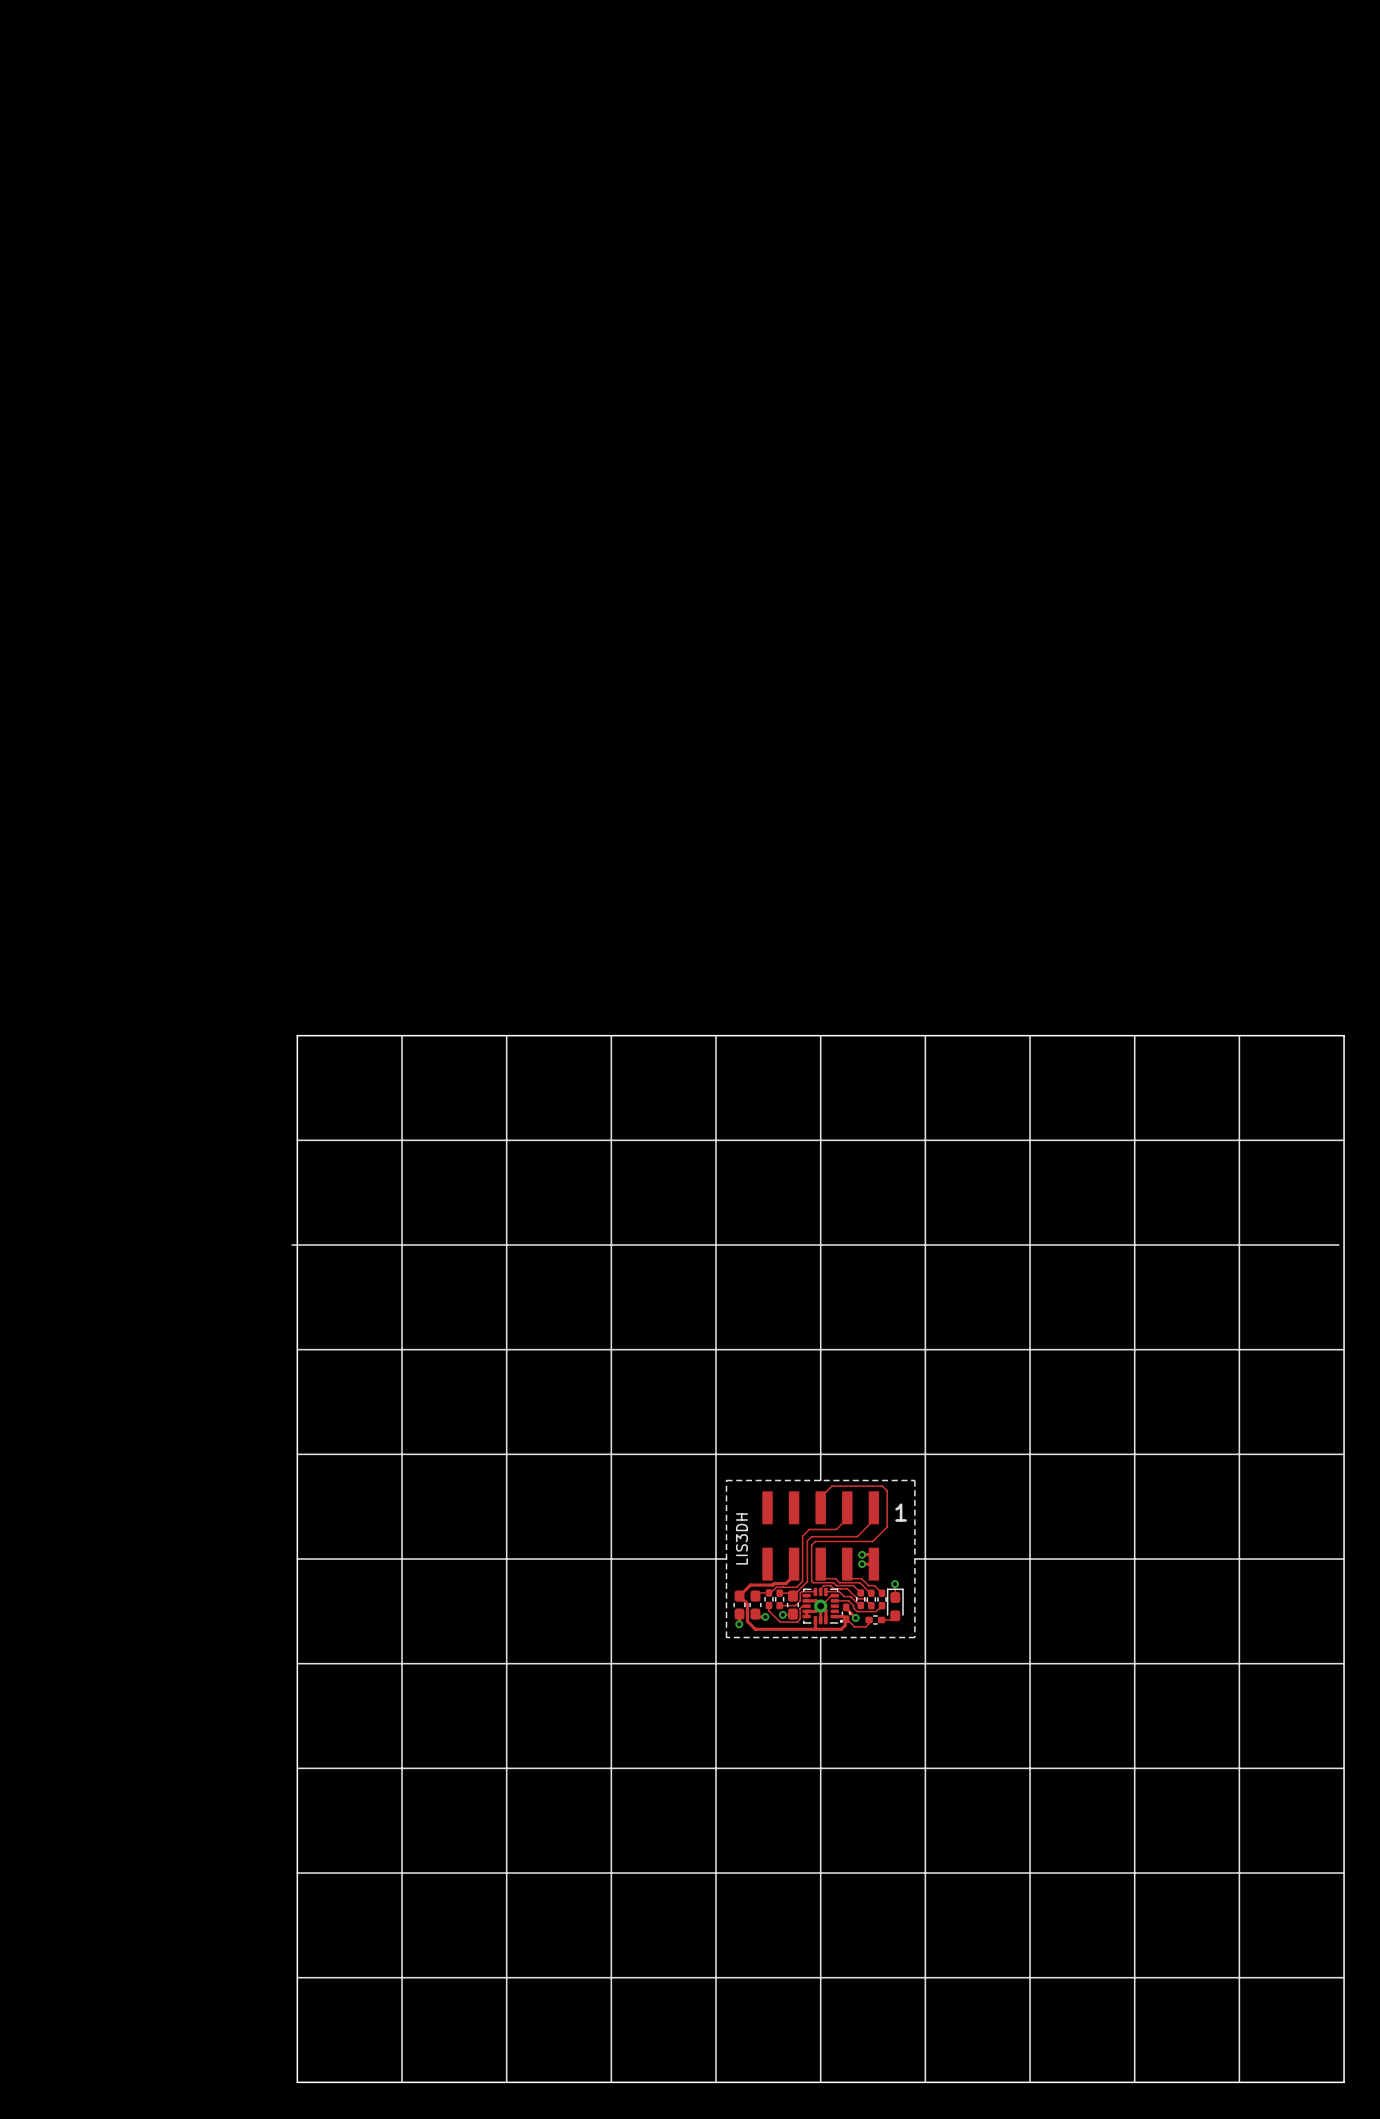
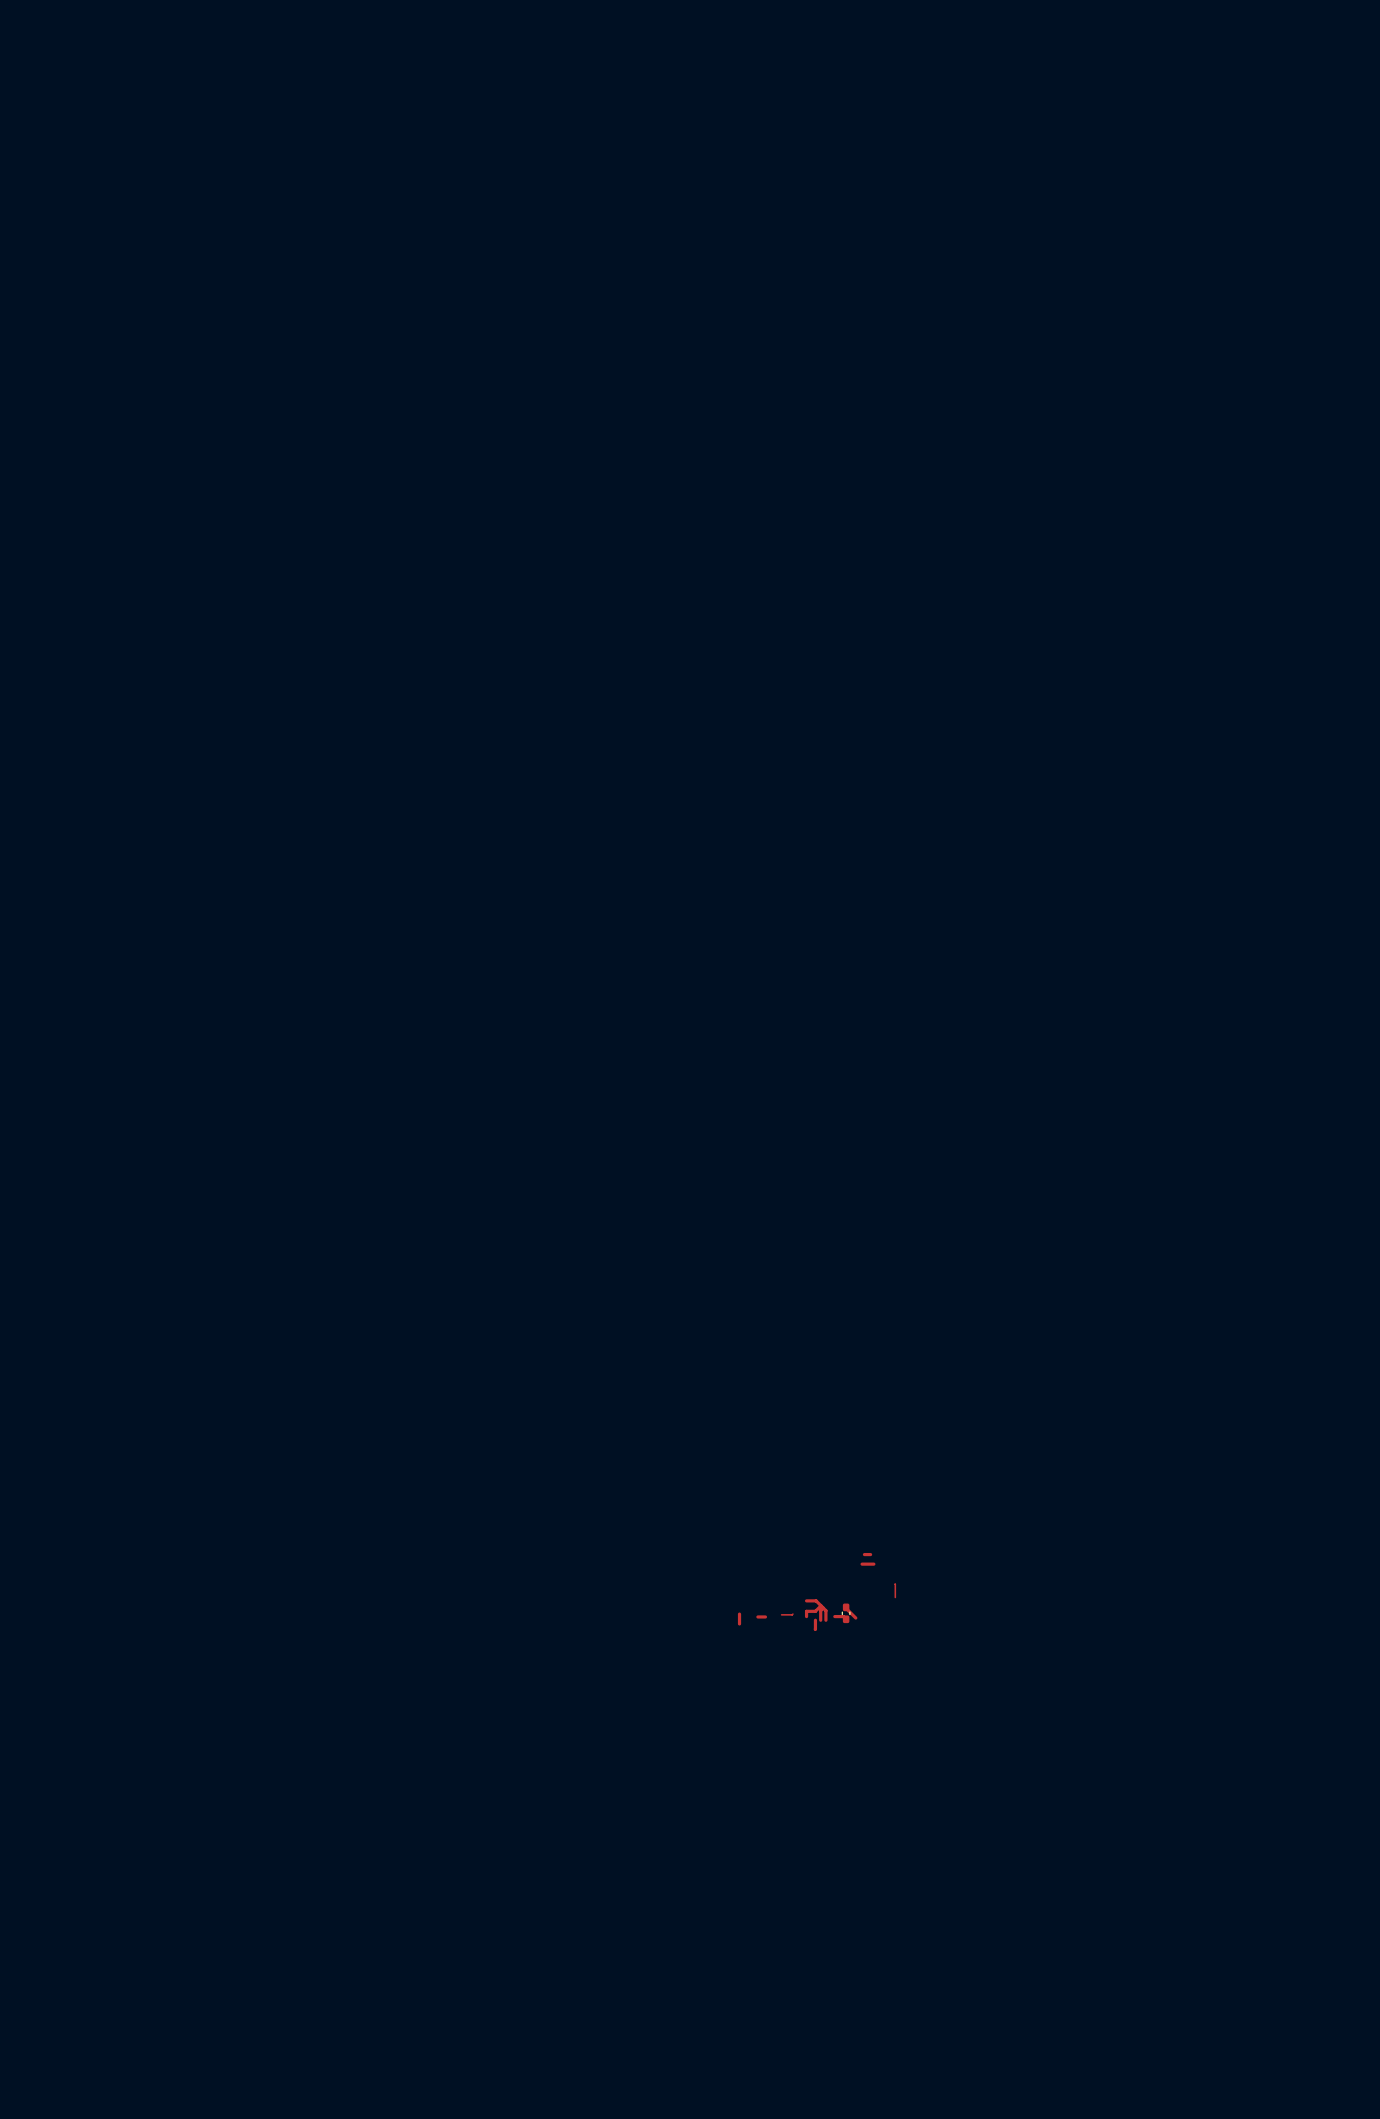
board edge: (297, 1035) (1344, 1035) (1344, 2082) (297, 2082) (297, 1035) -> none
line: (402, 1035) (402, 2082) -> none
line: (506, 1035) (506, 2082) -> none
line: (611, 1035) (611, 2082) -> none
line: (716, 1035) (716, 2082) -> none
line: (820, 1035) (820, 1480) -> none
line: (925, 1035) (925, 2082) -> none
line: (1030, 1035) (1030, 2082) -> none
line: (1134, 1035) (1134, 2082) -> none
line: (1239, 1035) (1239, 2082) -> none
line: (297, 1140) (1344, 1140) -> none
line: (292, 1245) (1338, 1245) -> none
line: (297, 1349) (1344, 1349) -> none
line: (297, 1454) (1344, 1454) -> none
line: (726, 1480) (914, 1480) (914, 1637) (726, 1637) (726, 1480) -> none
track: (820, 1509) (820, 1497) (831, 1486) (882, 1486) (887, 1490) (887, 1527) (872, 1541) (815, 1541) (811, 1545) (811, 1581) (813, 1582) (853, 1585) (860, 1592) -> none
track: (846, 1509) (846, 1519) (836, 1529) (809, 1529) (802, 1536) (802, 1581) (796, 1587) (776, 1587) (770, 1592) (758, 1592) (755, 1596) -> none
track: (873, 1509) (873, 1520) (857, 1536) (811, 1536) (807, 1540) (807, 1581) (792, 1596) (790, 1593) (779, 1593) -> none
text: 1 (901, 1512) -> none
part: (820, 1535) -> none
text: LIS3DH (741, 1538) -> none
via: (862, 1554) -> none
line: (297, 1559) (726, 1559) -> none
line: (914, 1559) (1344, 1559) -> none
track: (794, 1564) (794, 1575) (786, 1583) (750, 1585) (739, 1596) (747, 1603) (747, 1621) (755, 1629) (841, 1629) (845, 1625) (846, 1619) (854, 1626) (865, 1626) (869, 1623) (869, 1619) -> none
via: (862, 1564) -> none
track: (824, 1578) (835, 1578) (839, 1582) (859, 1582) (871, 1593) -> none
track: (851, 1578) (861, 1578) (868, 1585) (874, 1585) (882, 1593) -> none
via: (895, 1584) -> none
track: (815, 1591) (802, 1591) (800, 1600) (795, 1605) (779, 1605) -> none
track: (820, 1591) (823, 1585) (830, 1585) (833, 1588) (847, 1588) (857, 1598) (864, 1598) (871, 1605) -> none
track: (825, 1591) (839, 1591) (844, 1596) (850, 1596) (860, 1605) -> none
track: (834, 1595) (831, 1595) (823, 1603) -> none
part: (769, 1599) -> none
part: (779, 1599) -> none
part: (860, 1599) -> none
part: (871, 1599) -> none
part: (882, 1599) -> none
track: (833, 1600) (848, 1600) (857, 1611) (876, 1611) (882, 1605) -> none
part: (739, 1605) -> none
part: (755, 1605) -> none
track: (769, 1605) (769, 1610) (780, 1622) (797, 1622) (800, 1619) (800, 1608) (806, 1606) -> none
part: (792, 1605) -> none
part: (895, 1605) -> none
via: (820, 1606) -> none
part: (822, 1606) -> none
via: (782, 1614) -> none
track: (895, 1615) (891, 1619) (881, 1619) -> none
via: (765, 1616) -> none
via: (855, 1618) -> none
part: (875, 1619) -> none
via: (739, 1624) -> none
line: (820, 1637) (820, 2082) -> none
line: (297, 1663) (1344, 1663) -> none
line: (297, 1768) (1344, 1768) -> none
line: (297, 1873) (1344, 1873) -> none
line: (297, 1977) (1344, 1977) -> none

